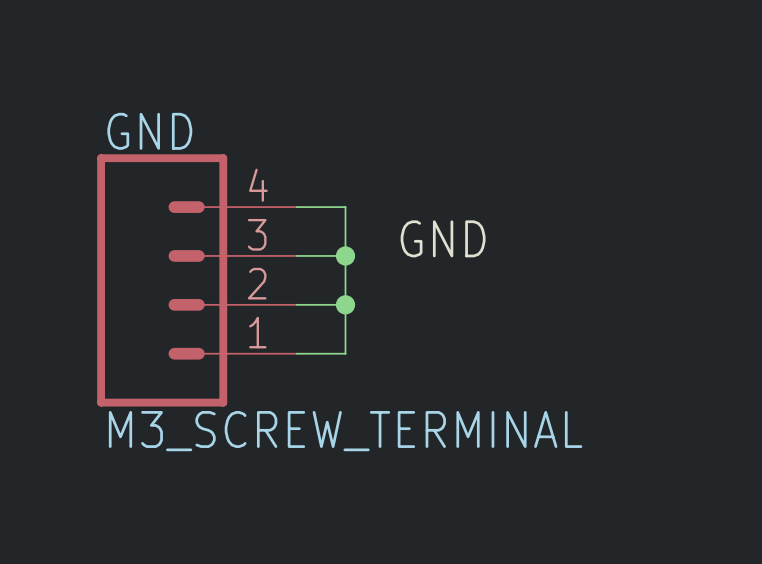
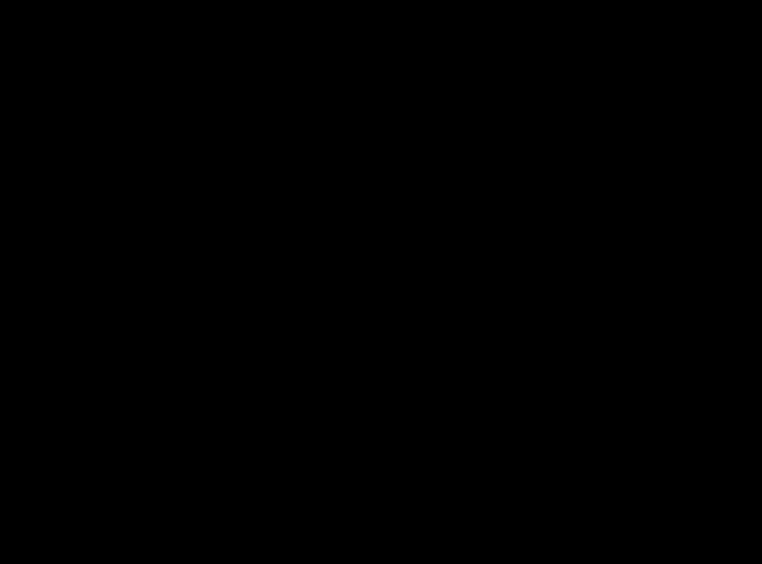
wire: (296, 207) (345, 207) (345, 353) (296, 353) -> none
label: GND (443, 238) -> none
wire: (296, 255) (345, 255) -> none
junction: (345, 255) -> none
GND: M3_SCREW_TERMINAL (196, 280) -> none
wire: (296, 304) (345, 304) -> none
junction: (345, 304) -> none

